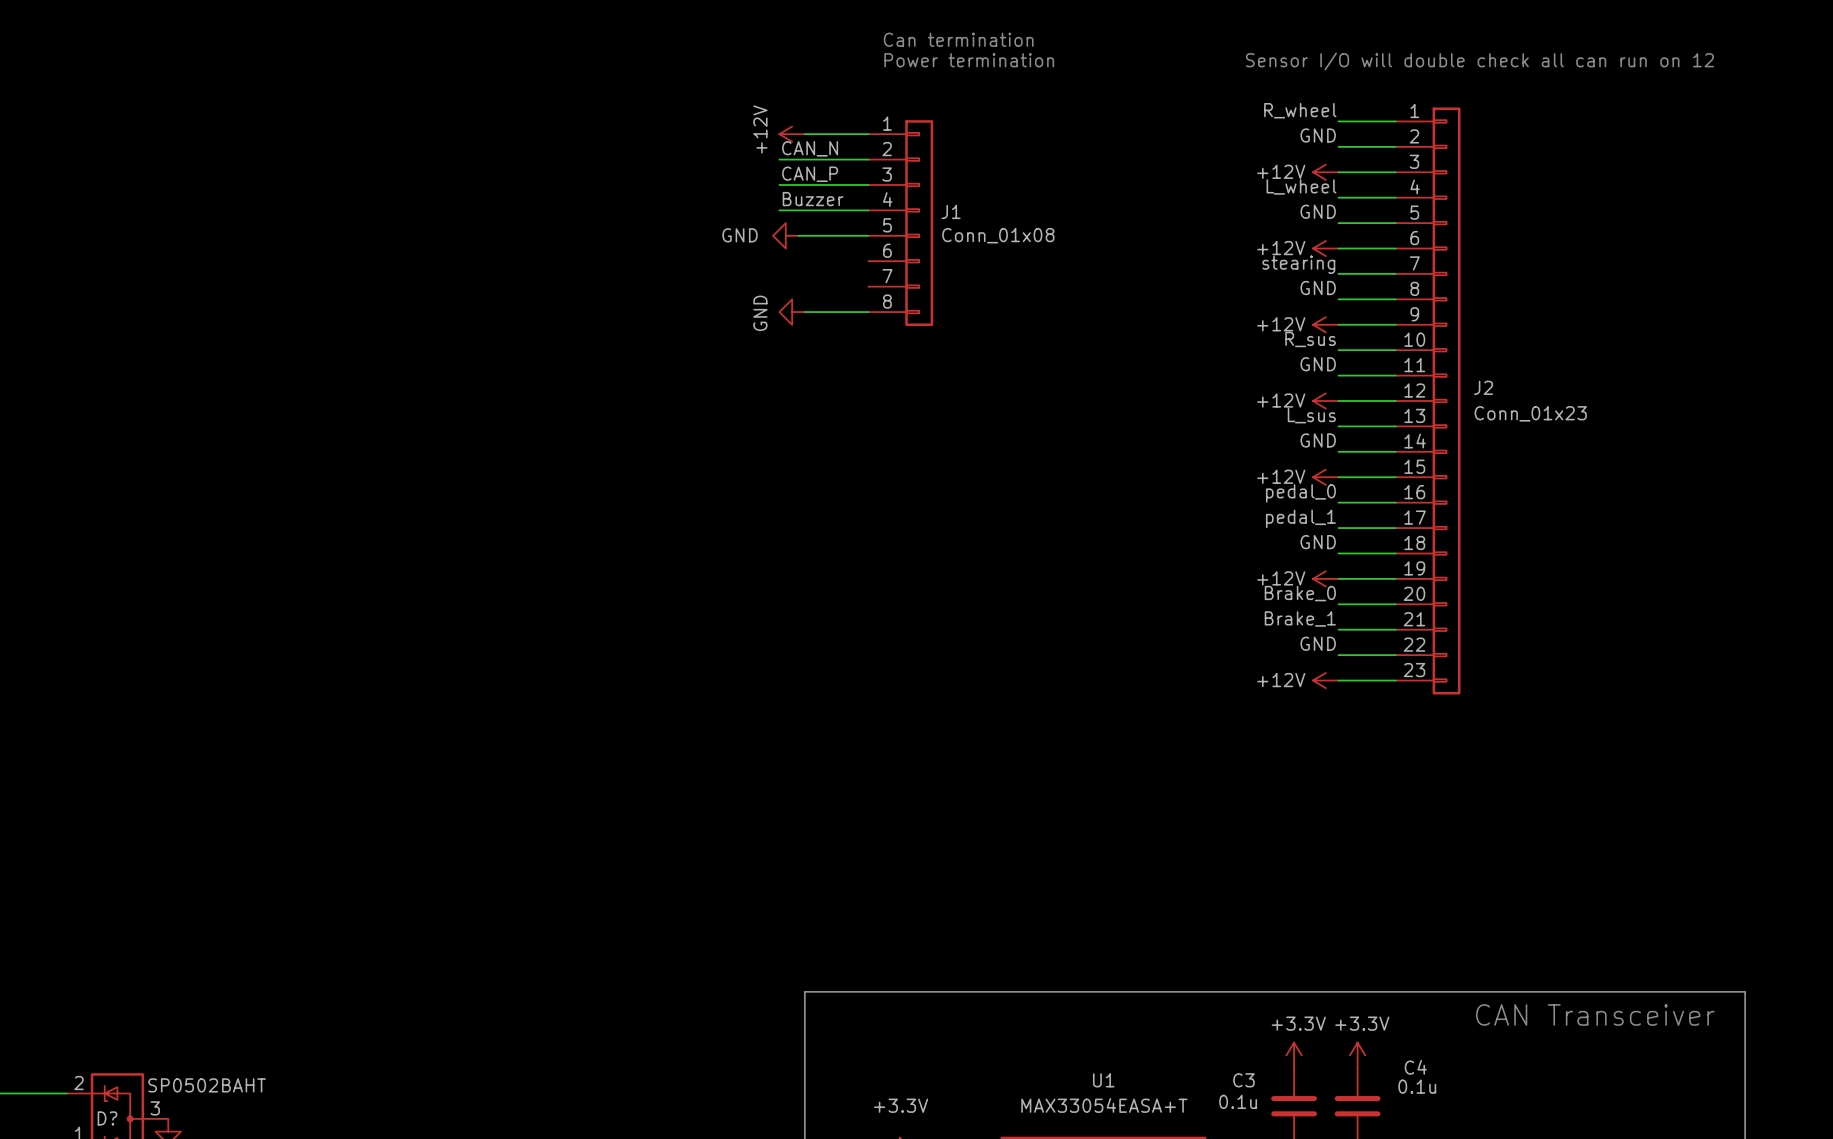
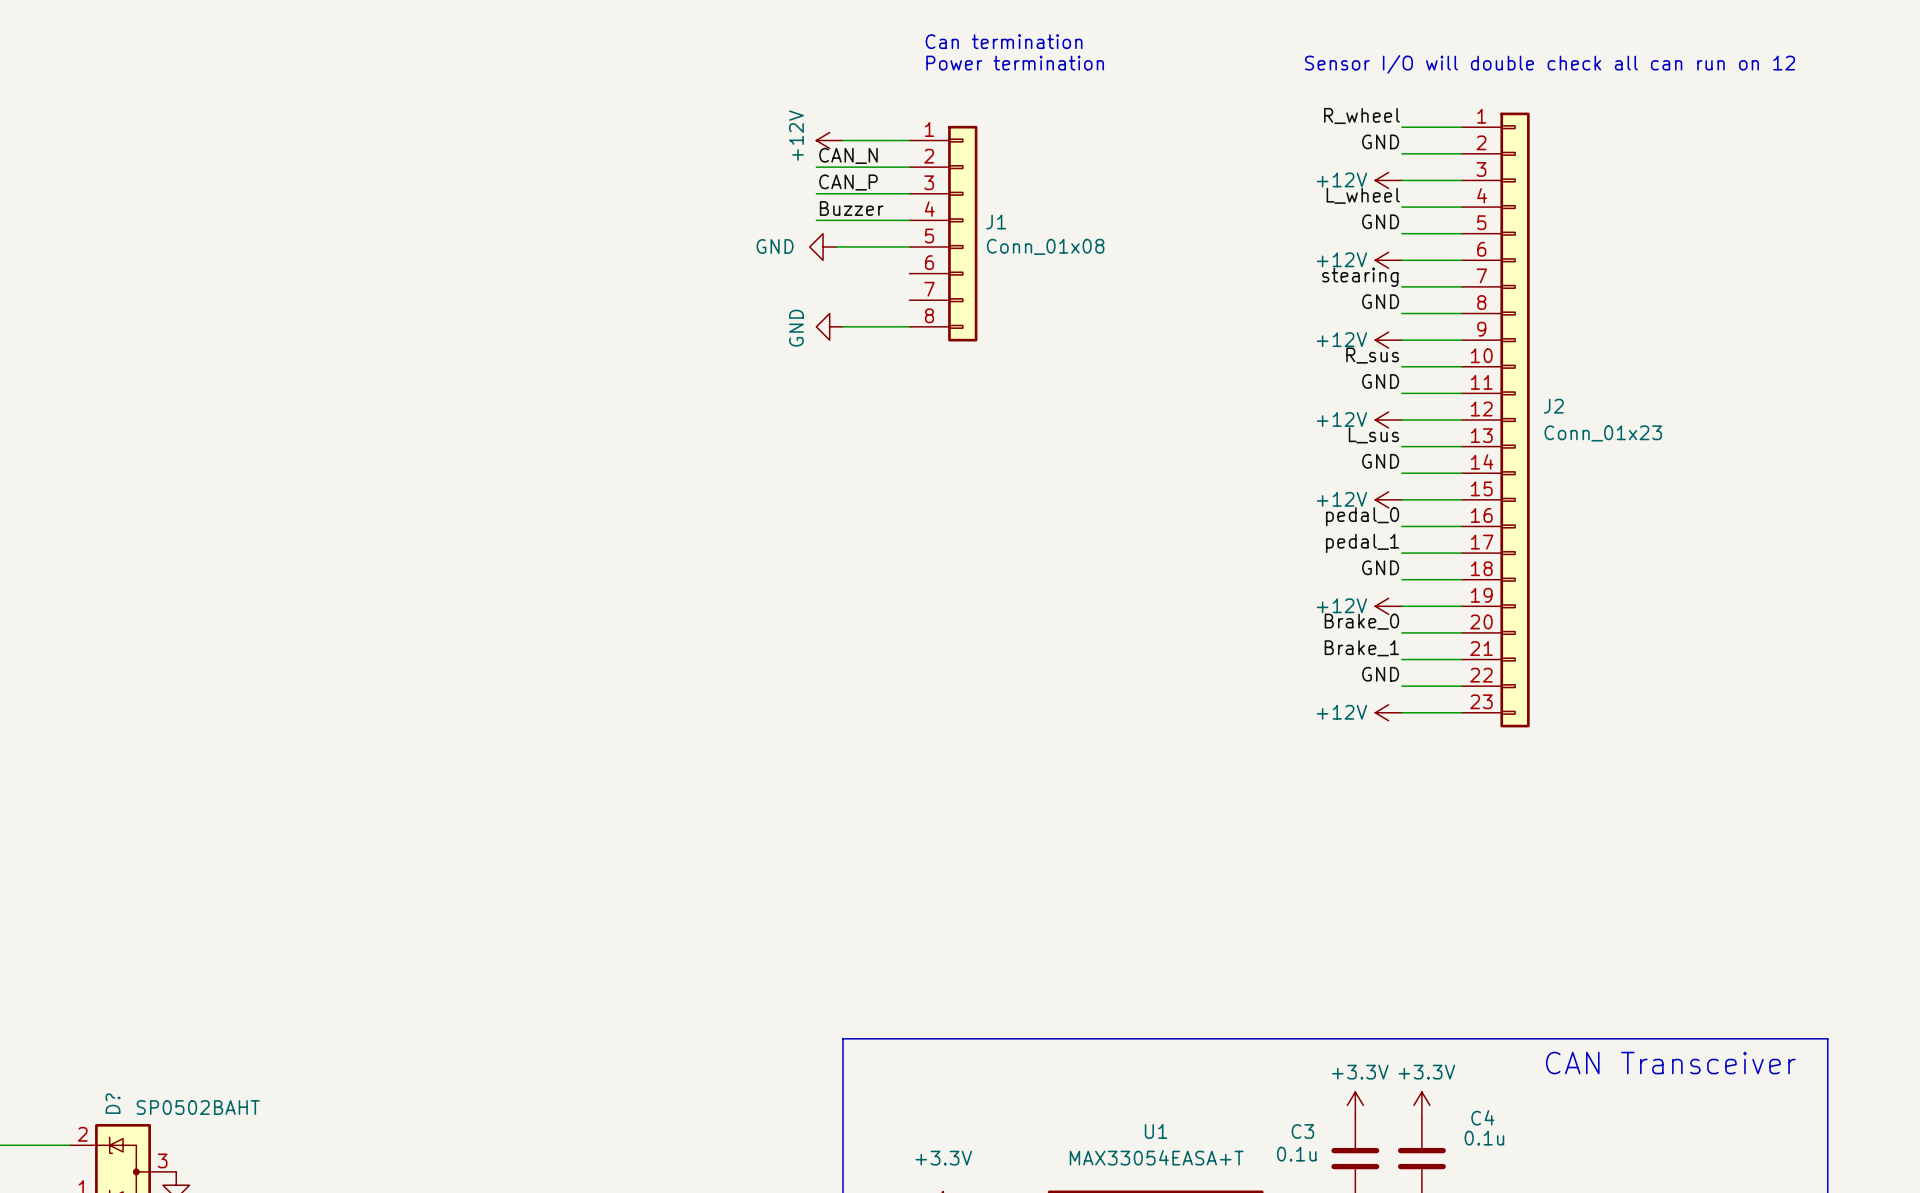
D? value position: SP0502BAHT (207, 1085) -> SP0502BAHT (198, 1107)
D? name rotation: 0° (107, 1118) -> 90° counterclockwise (113, 1103)
D? name position: D? (107, 1118) -> D? (113, 1103)

